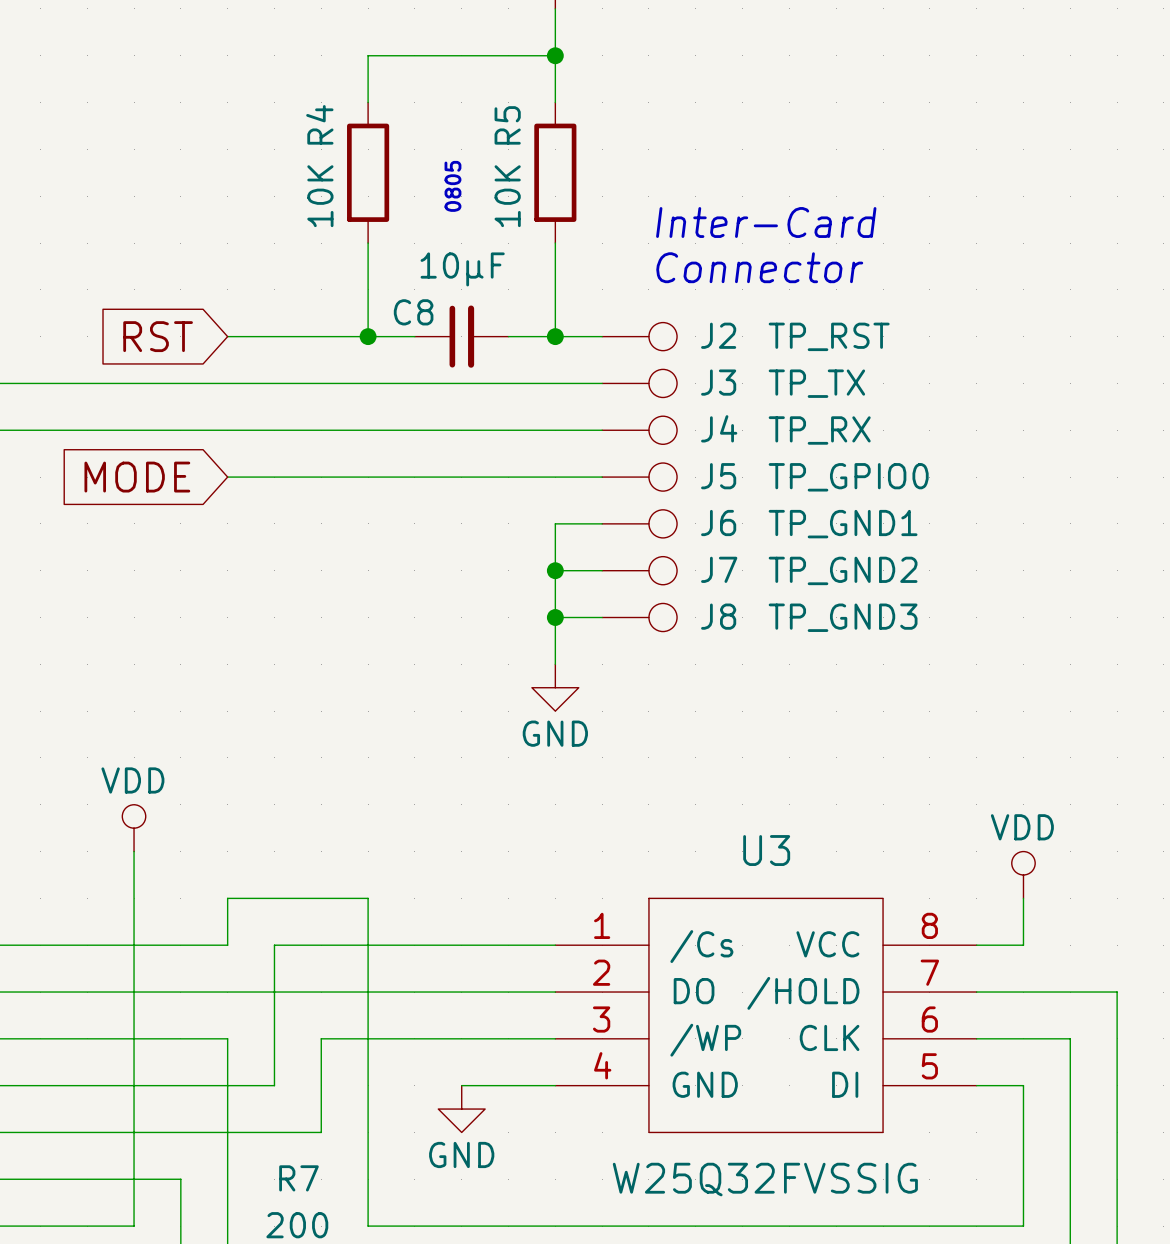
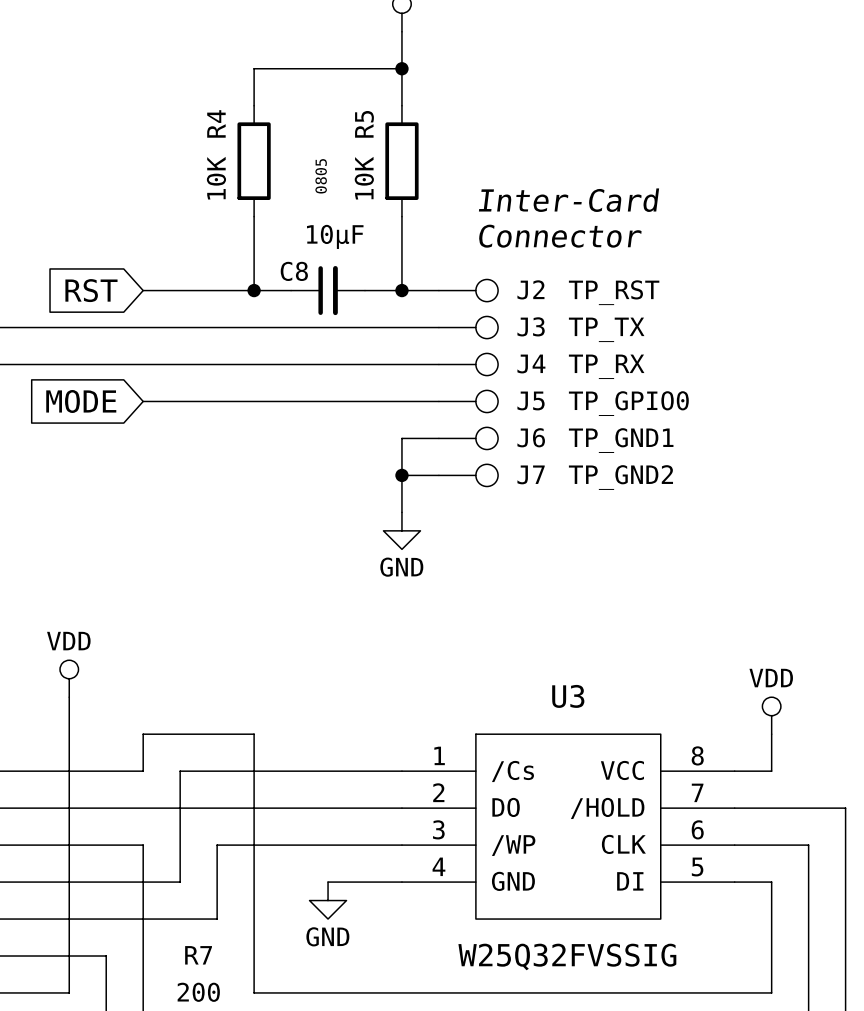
junction: (555, 617) -> none
wire: (602, 617) (555, 617) (555, 664) -> none
J8: TP_GND3 (639, 617) -> none
power symbol position: GND (555, 687) -> GND (401, 530)

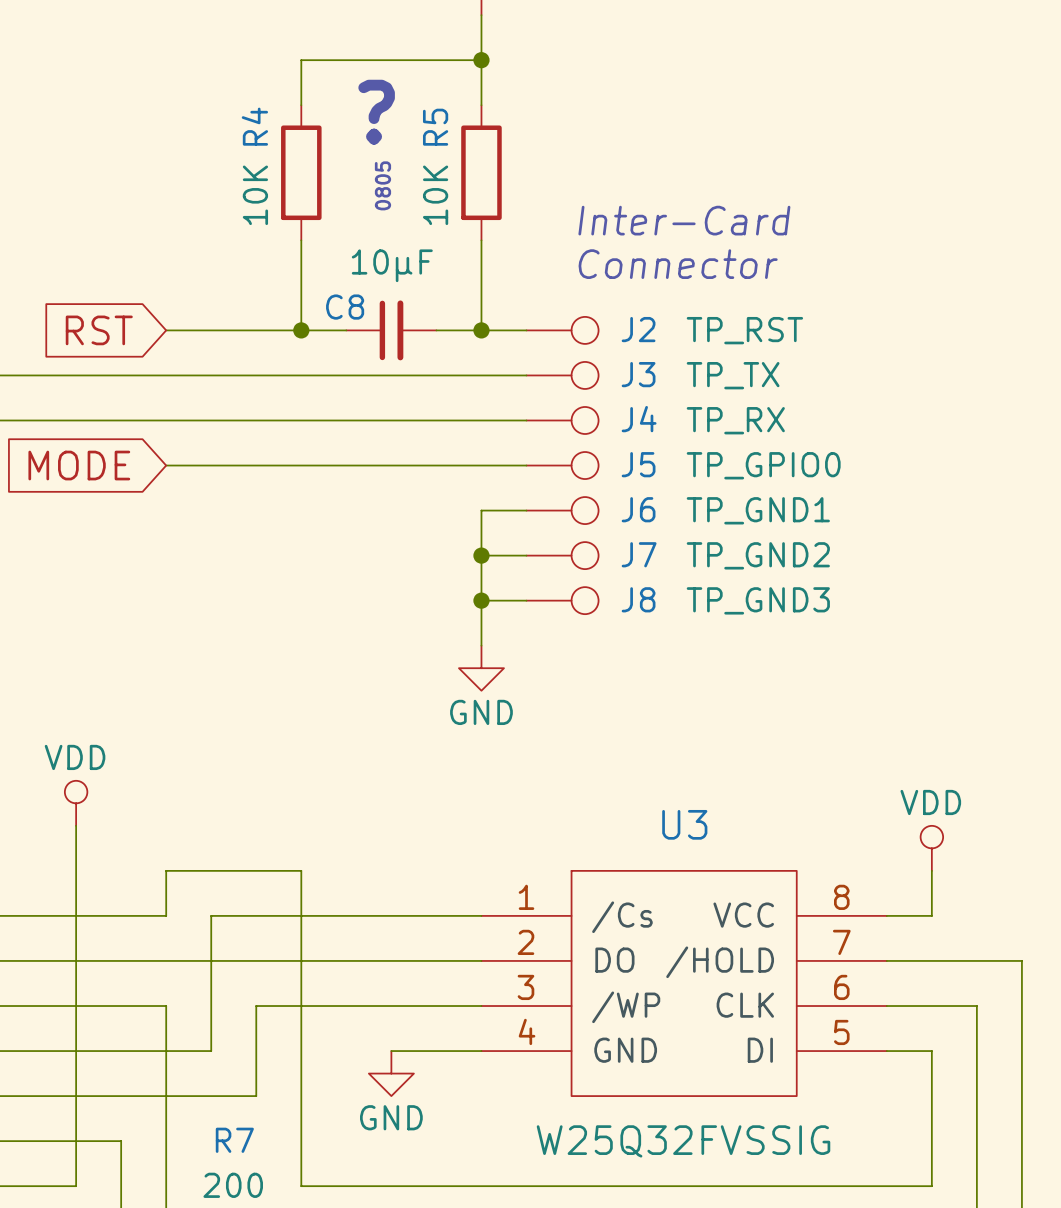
text: none -> ? (376, 112)
junction: none -> (481, 600)
wire: none -> (526, 600) (481, 600) (481, 645)
J8: none -> TP_GND3 (562, 600)
power symbol position: GND (401, 530) -> GND (481, 668)

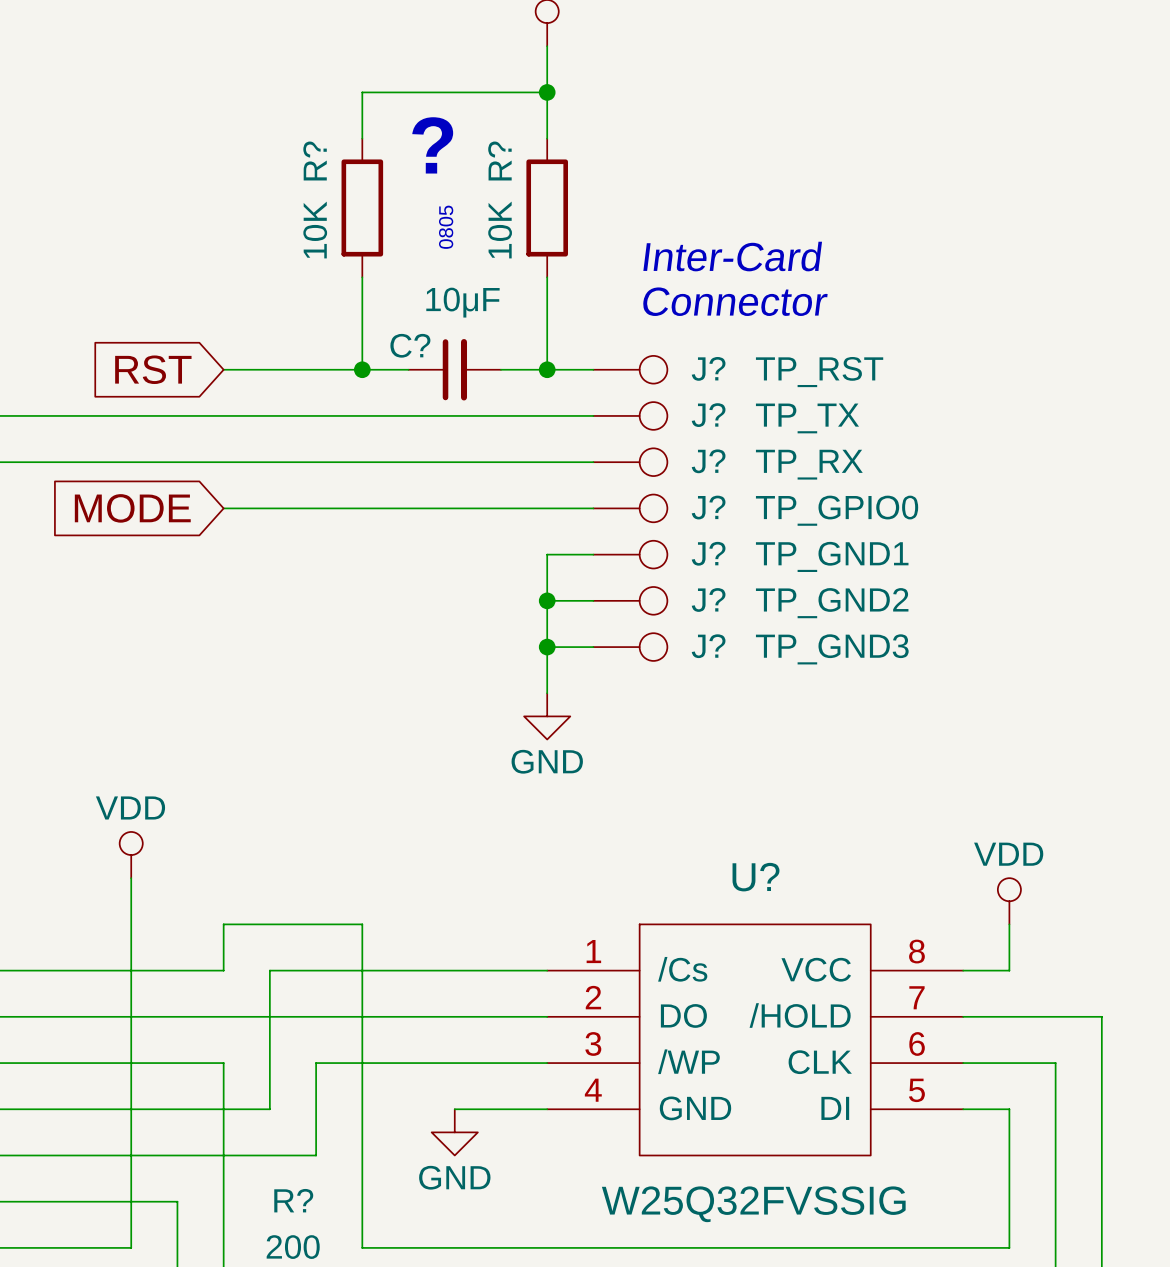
R4 name: R4 (254, 126) -> R? (315, 161)
R5 name: R5 (435, 127) -> R? (499, 161)
C8 name: C8 (345, 307) -> C? (410, 345)
J2 name: J2 (638, 329) -> J? (708, 368)
J3 name: J3 (638, 374) -> J? (708, 415)
J4 name: J4 (639, 419) -> J? (708, 461)
J5 name: J5 (638, 464) -> J? (708, 507)
J6 name: J6 (638, 509) -> J? (708, 553)
J7 name: J7 (639, 554) -> J? (708, 599)
J8 name: J8 (638, 599) -> J? (708, 646)
U3 name: U3 (684, 824) -> U? (756, 877)
R7 name: R7 (234, 1140) -> R? (293, 1200)

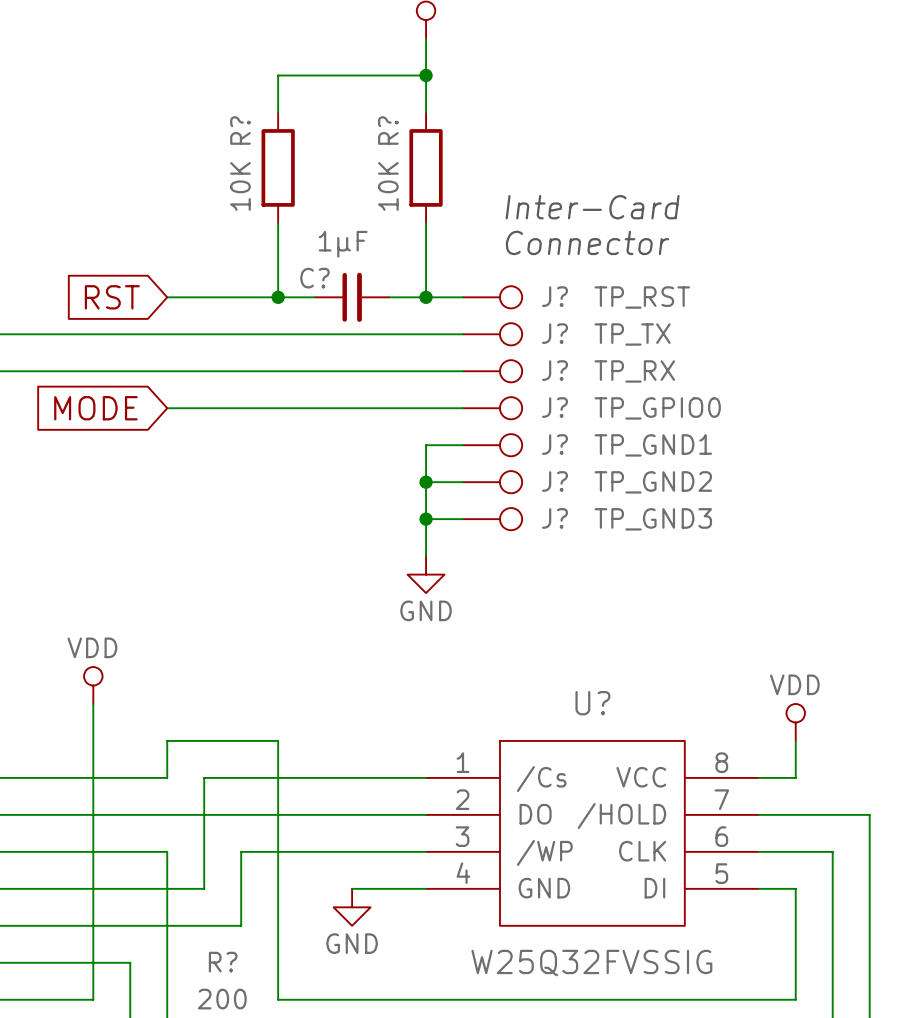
text: ? (432, 145) -> none
text: 0805 (446, 227) -> none
C? value: 10μF (462, 302) -> 1μF (343, 244)

